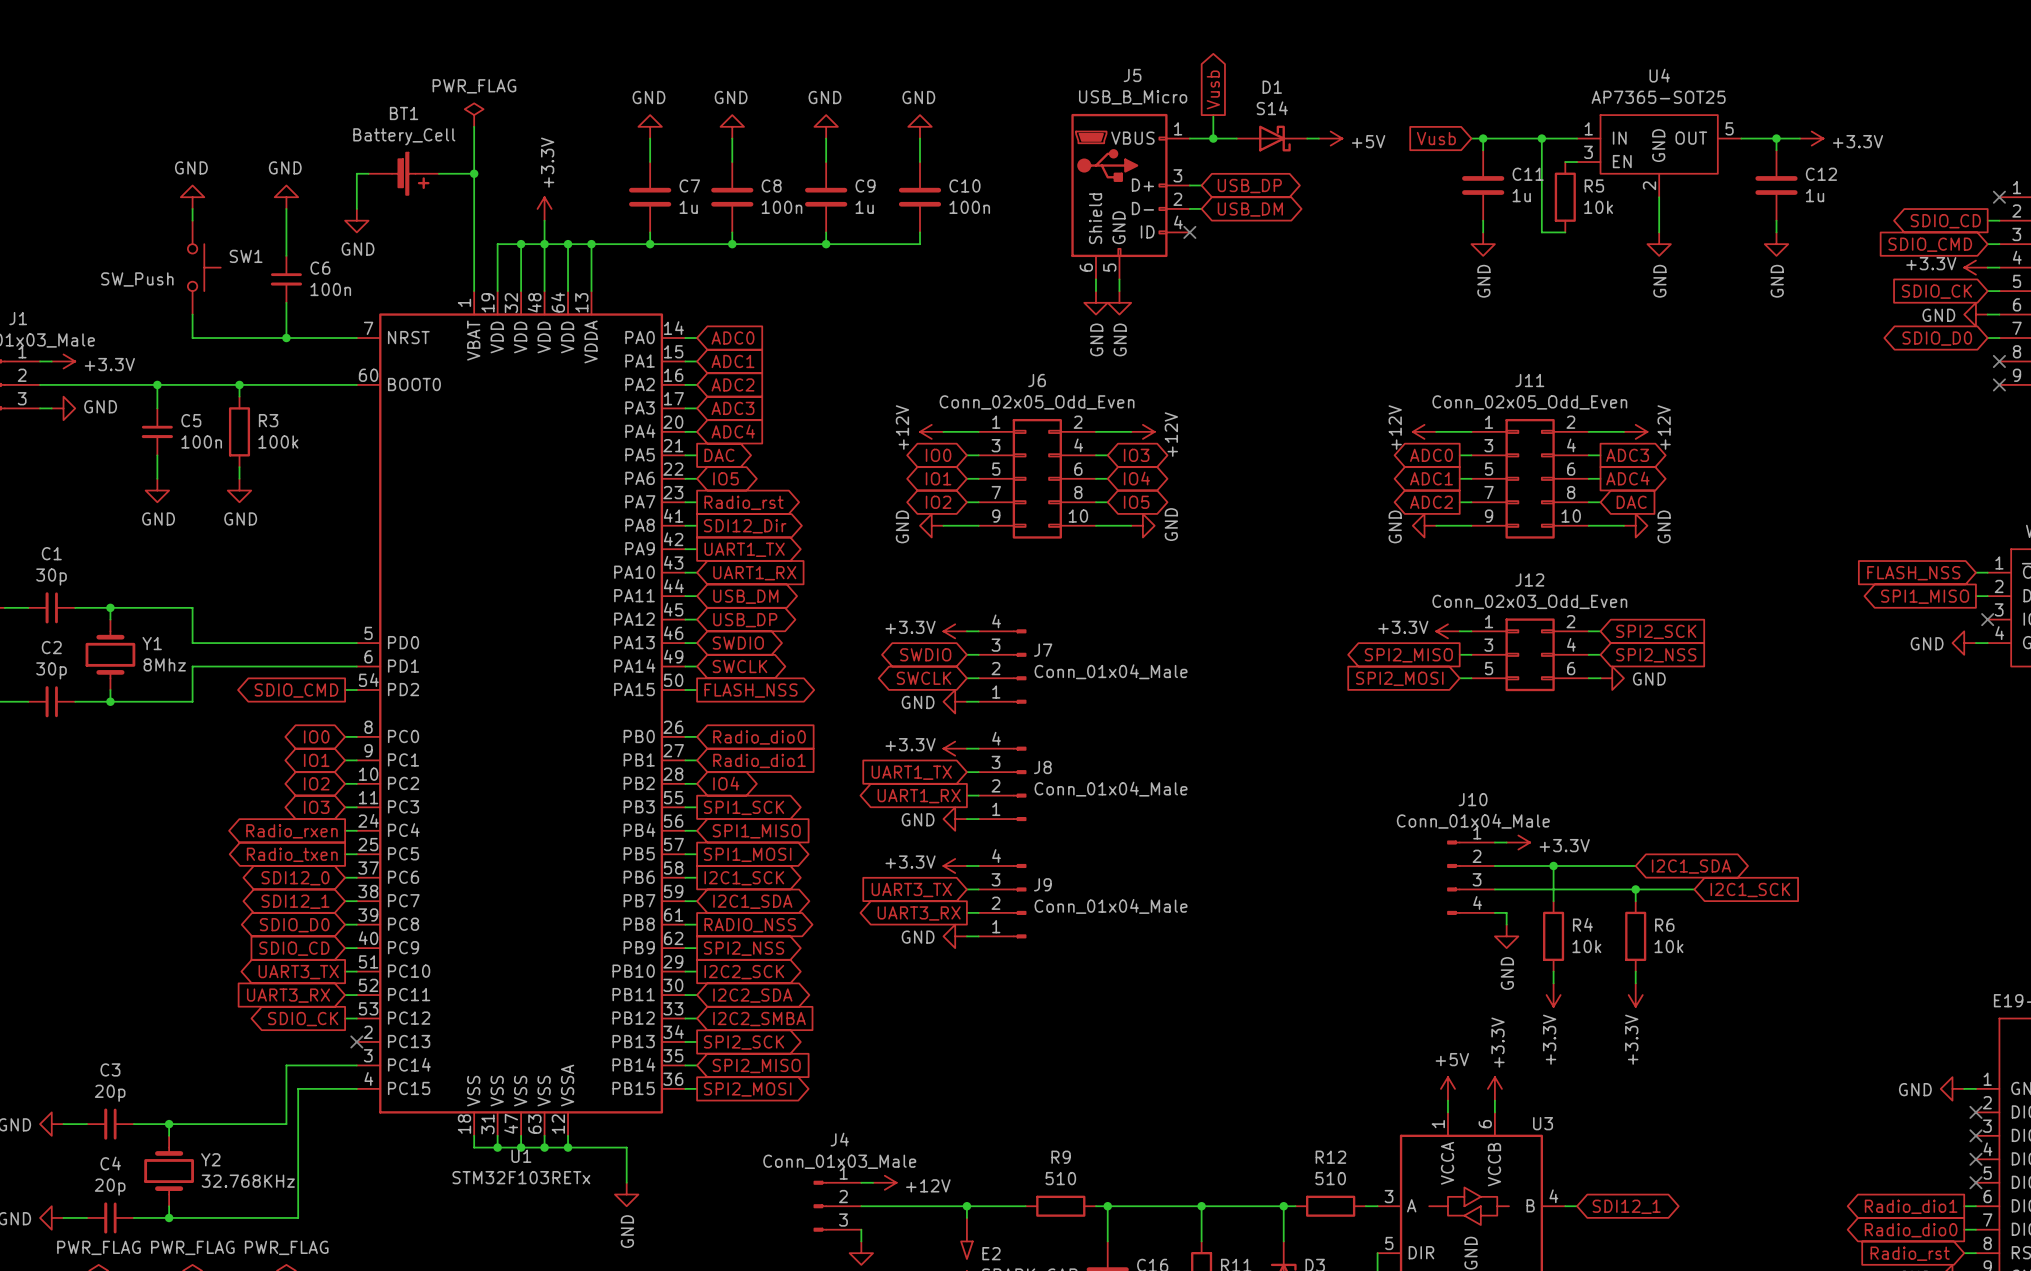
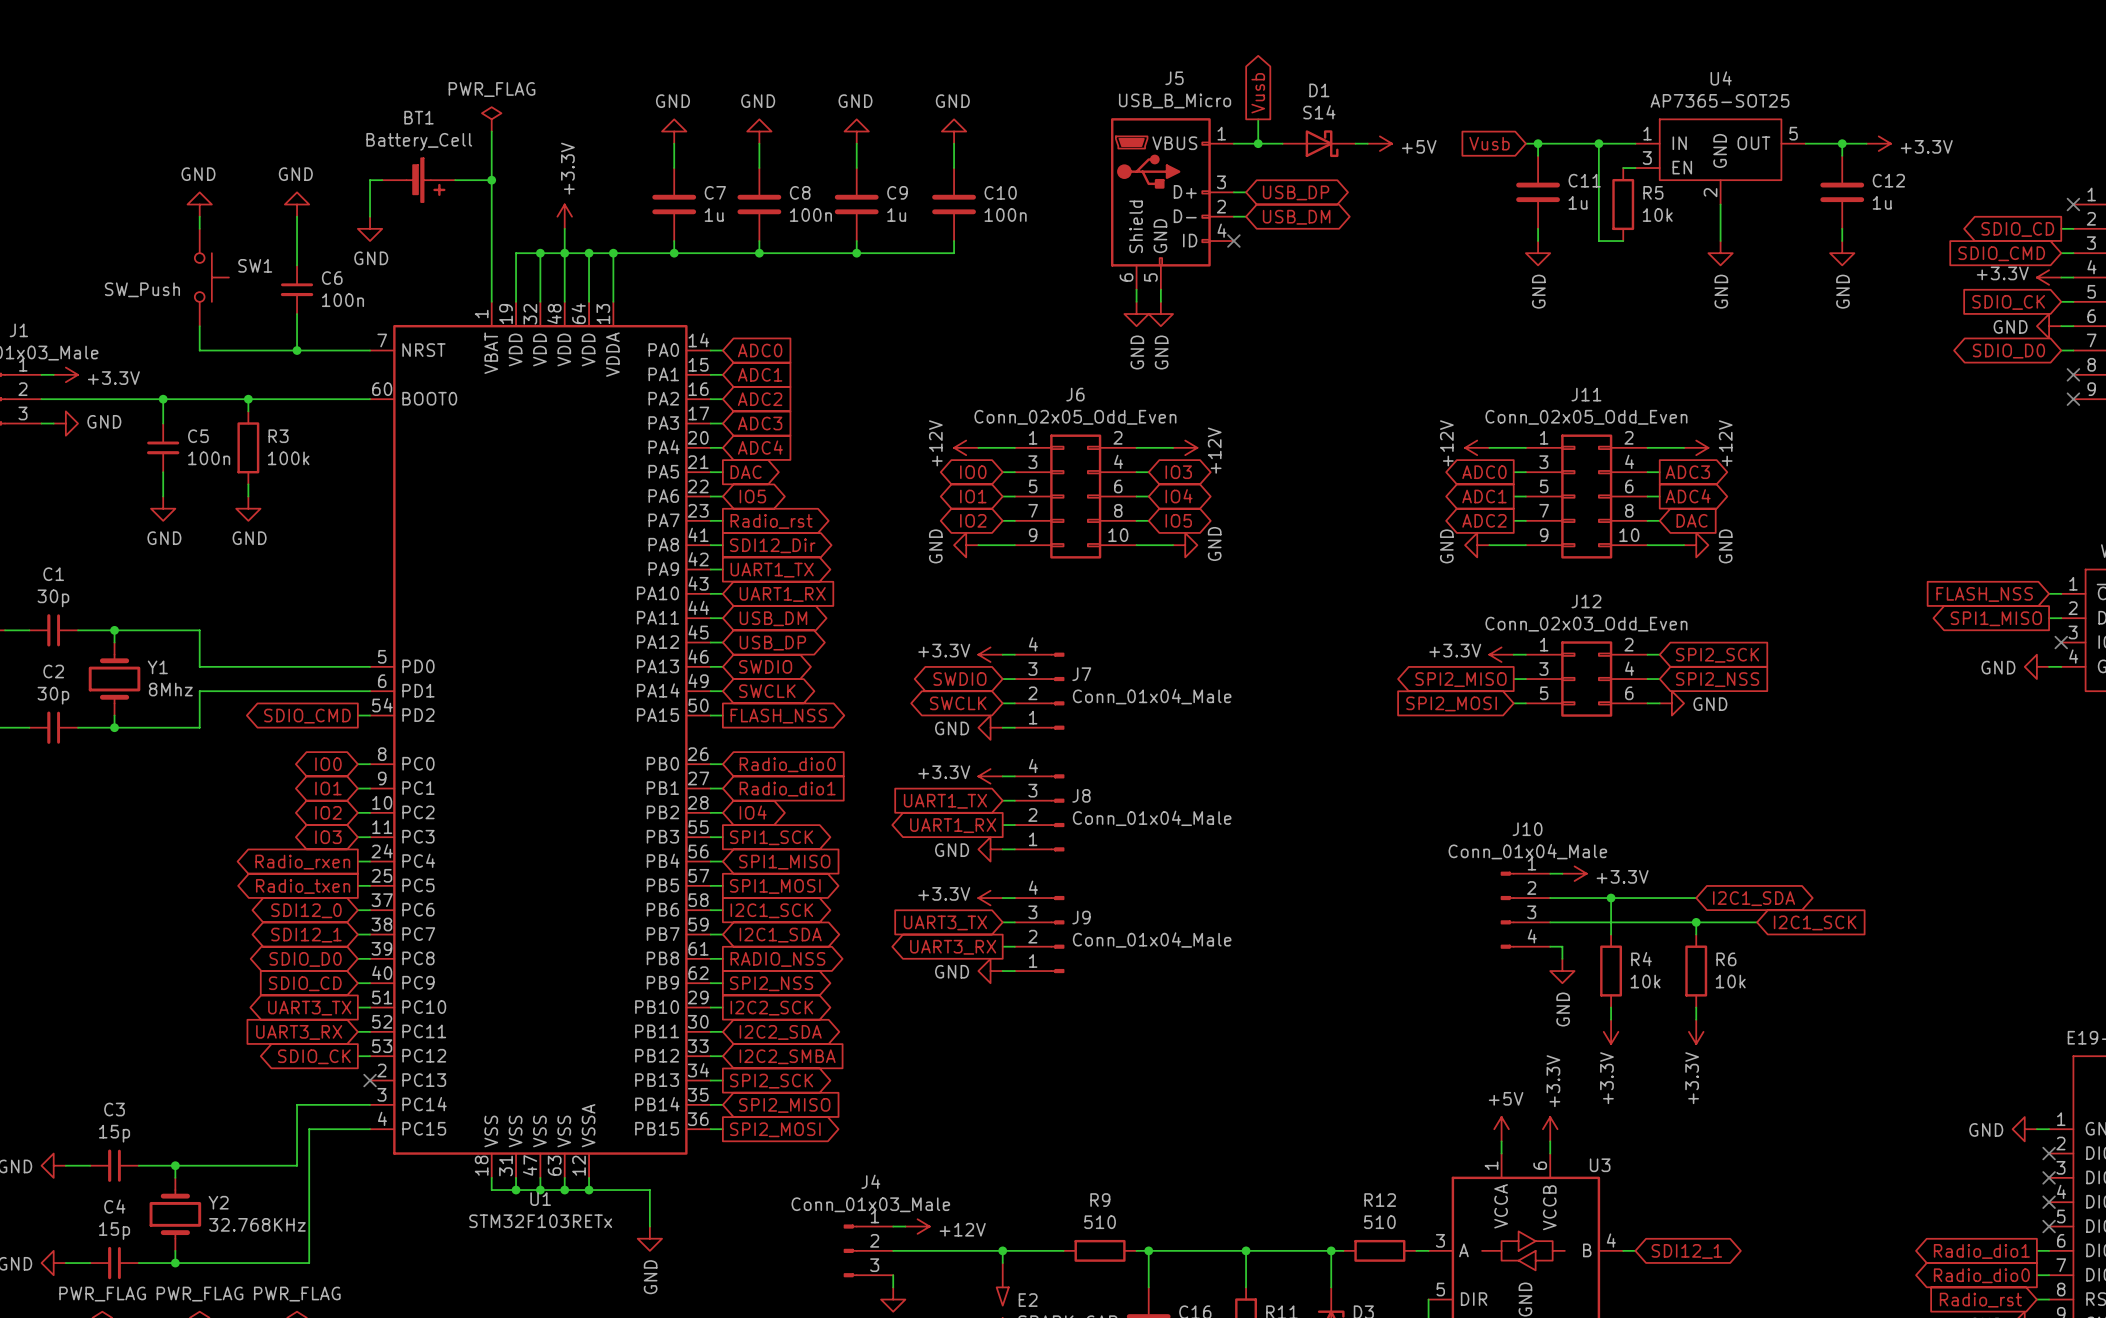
C3 value: 20p (110, 1093) -> 15p (114, 1133)
C4 value: 20p (110, 1187) -> 15p (114, 1231)

